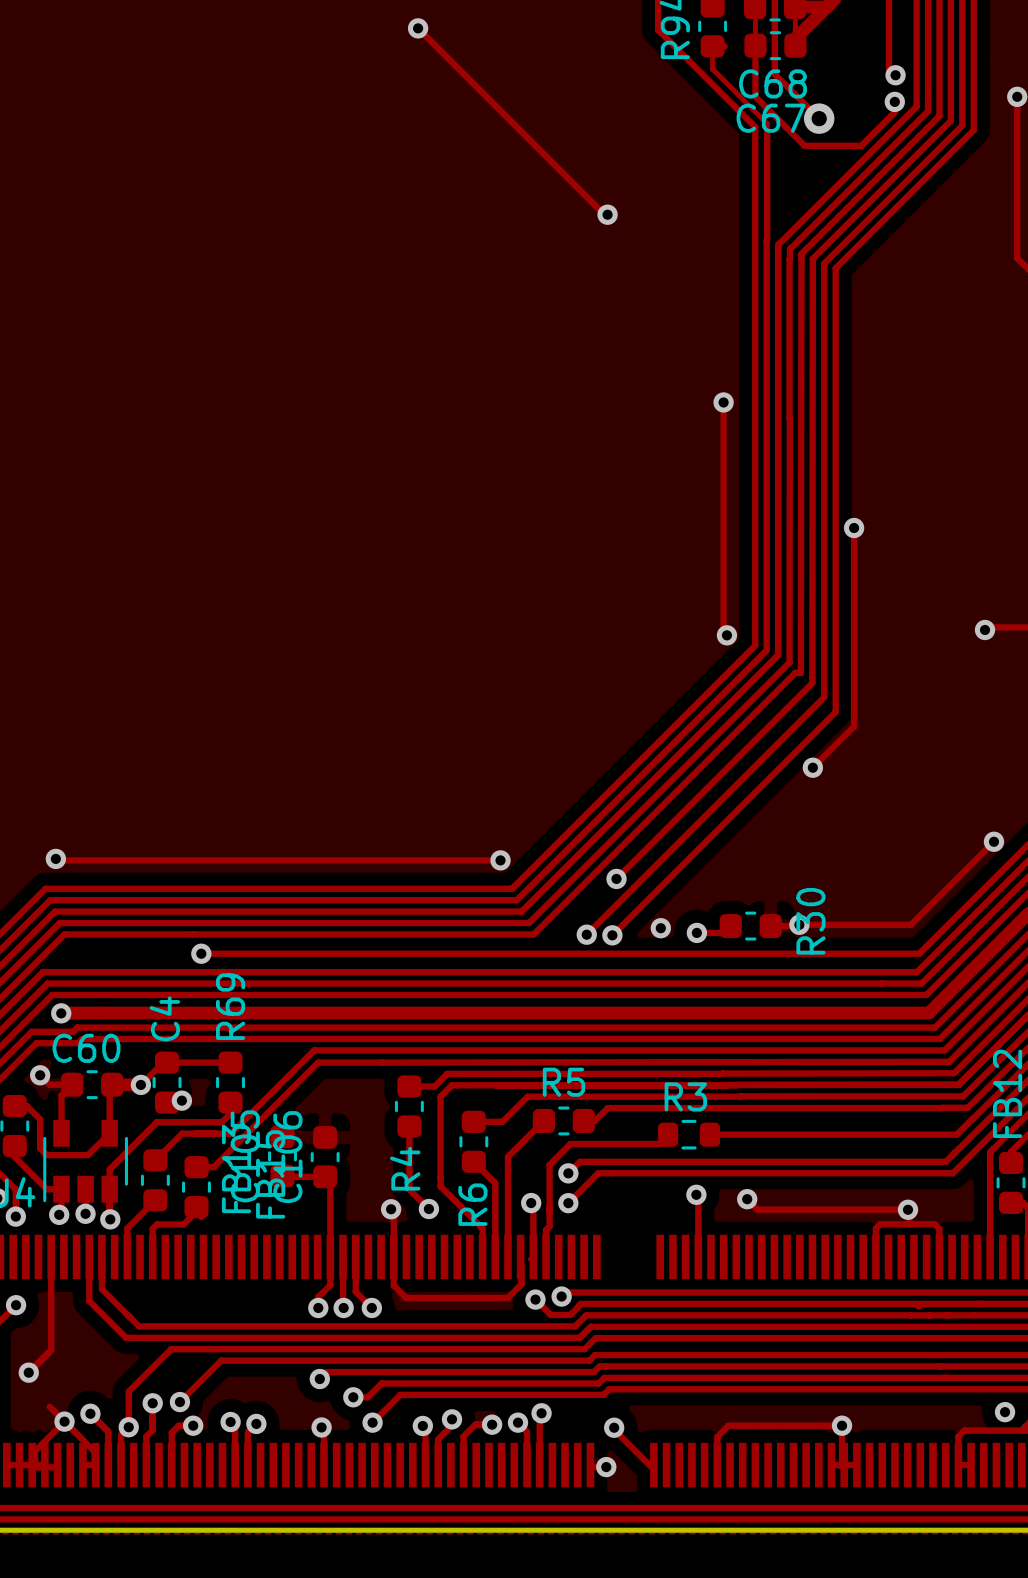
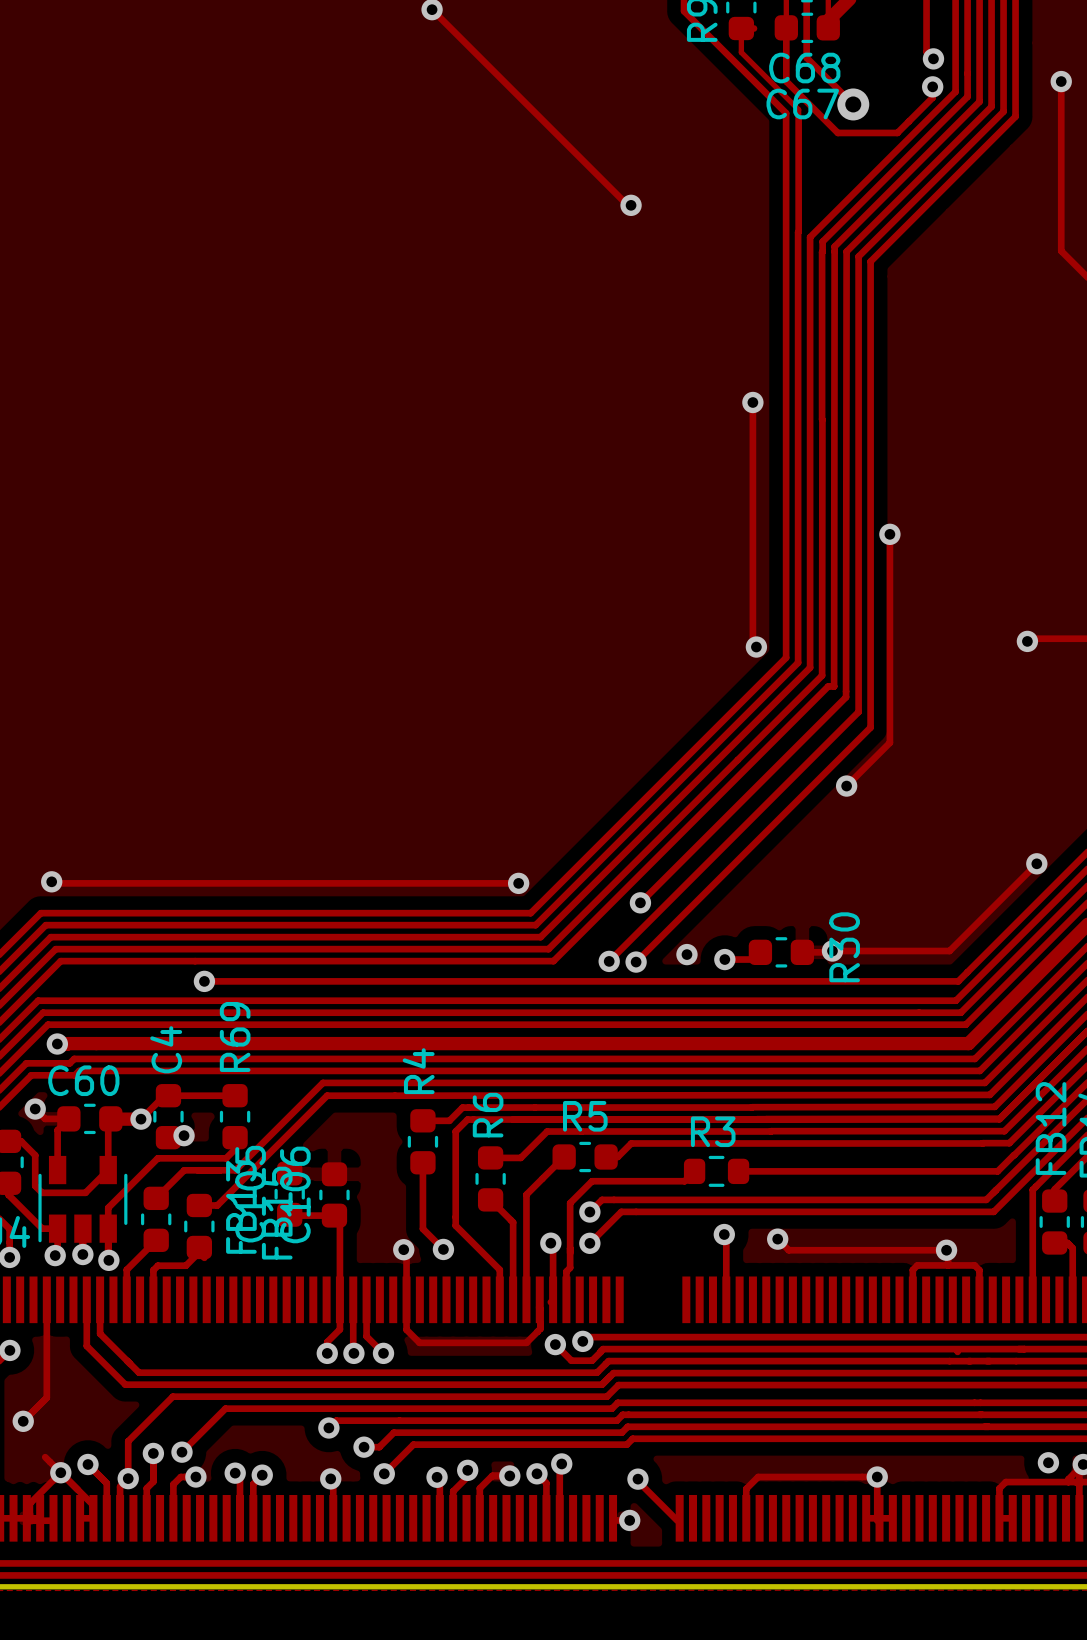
R4 name position: R4 (405, 1168) -> R4 (418, 1071)
R6 name position: R6 (472, 1204) -> R6 (488, 1115)

